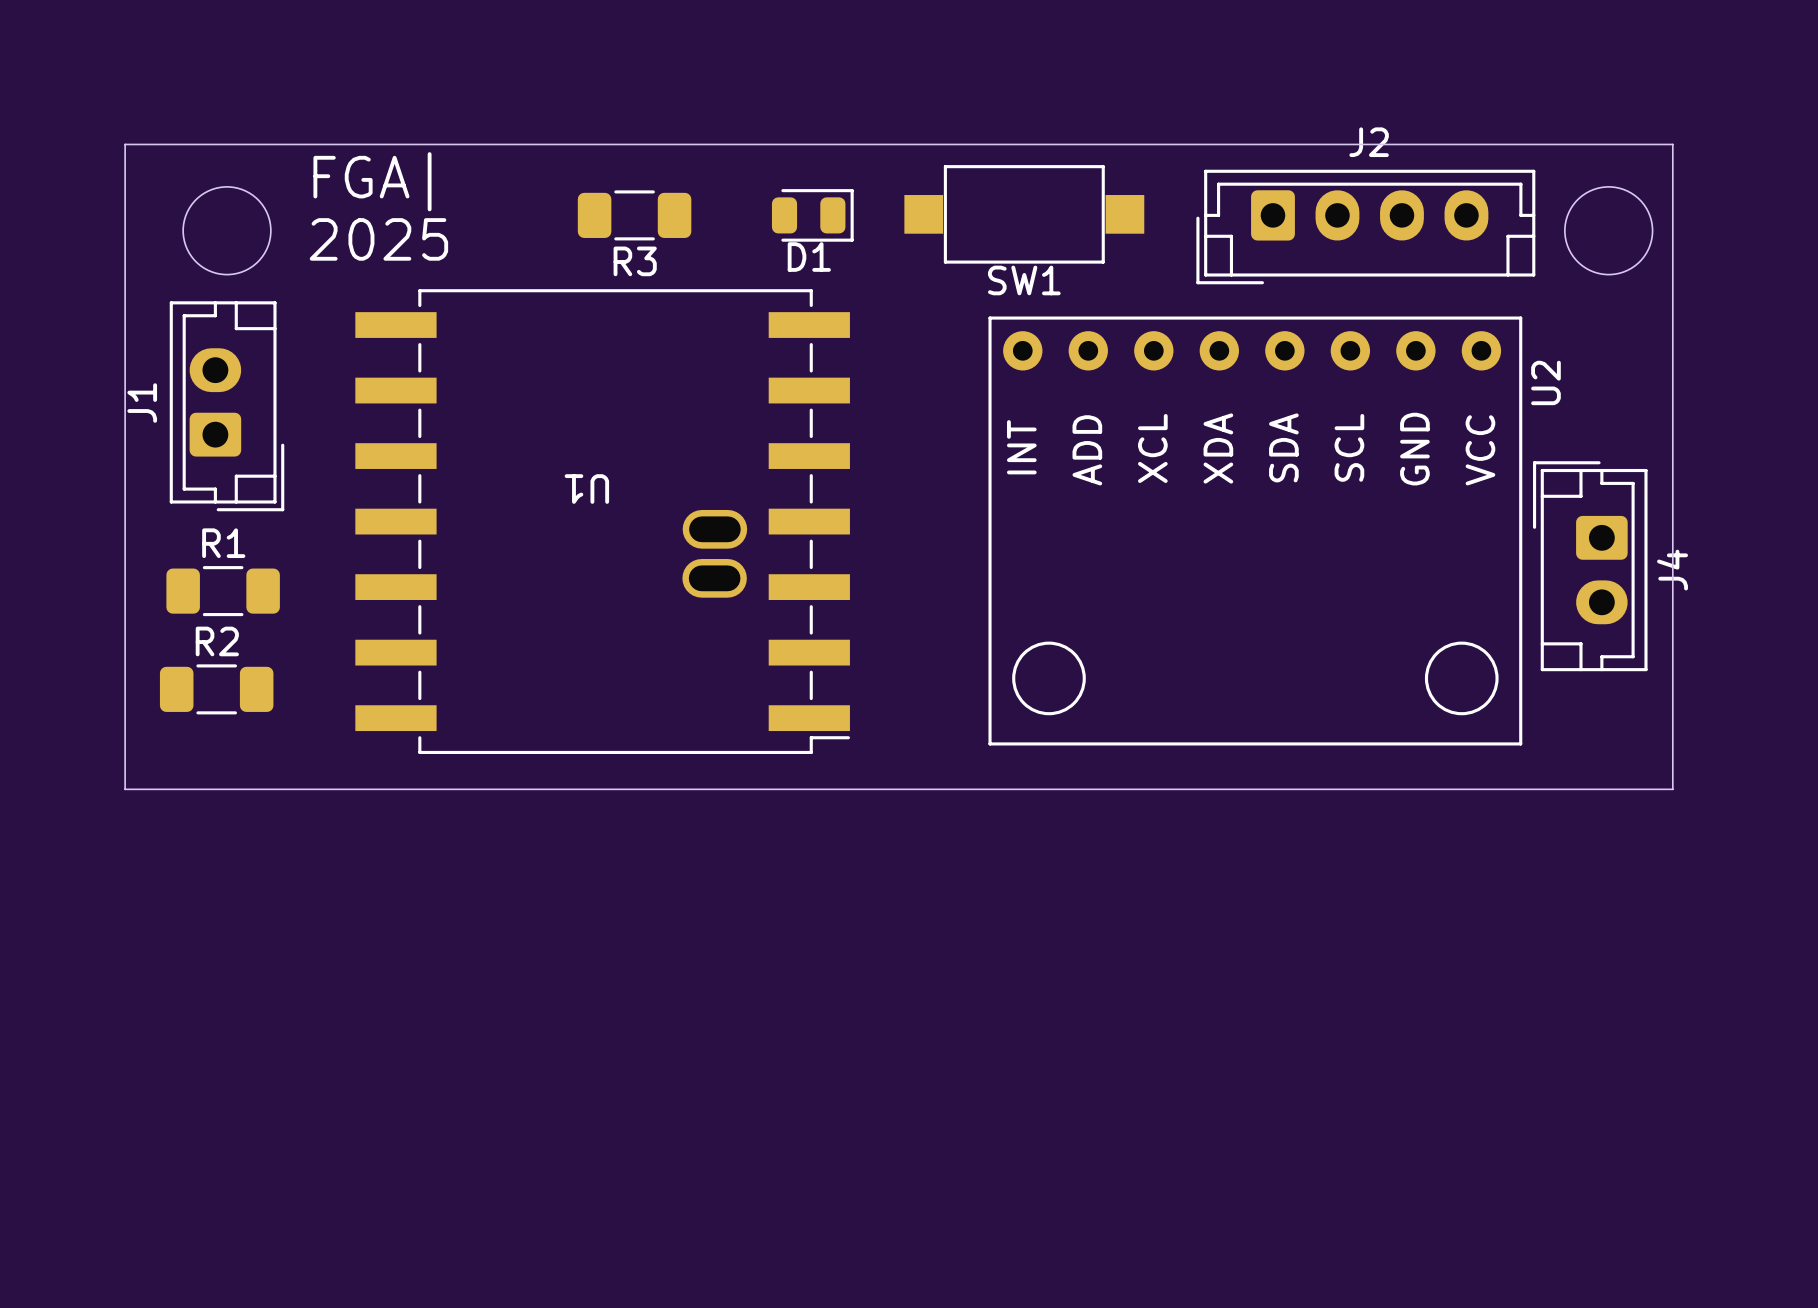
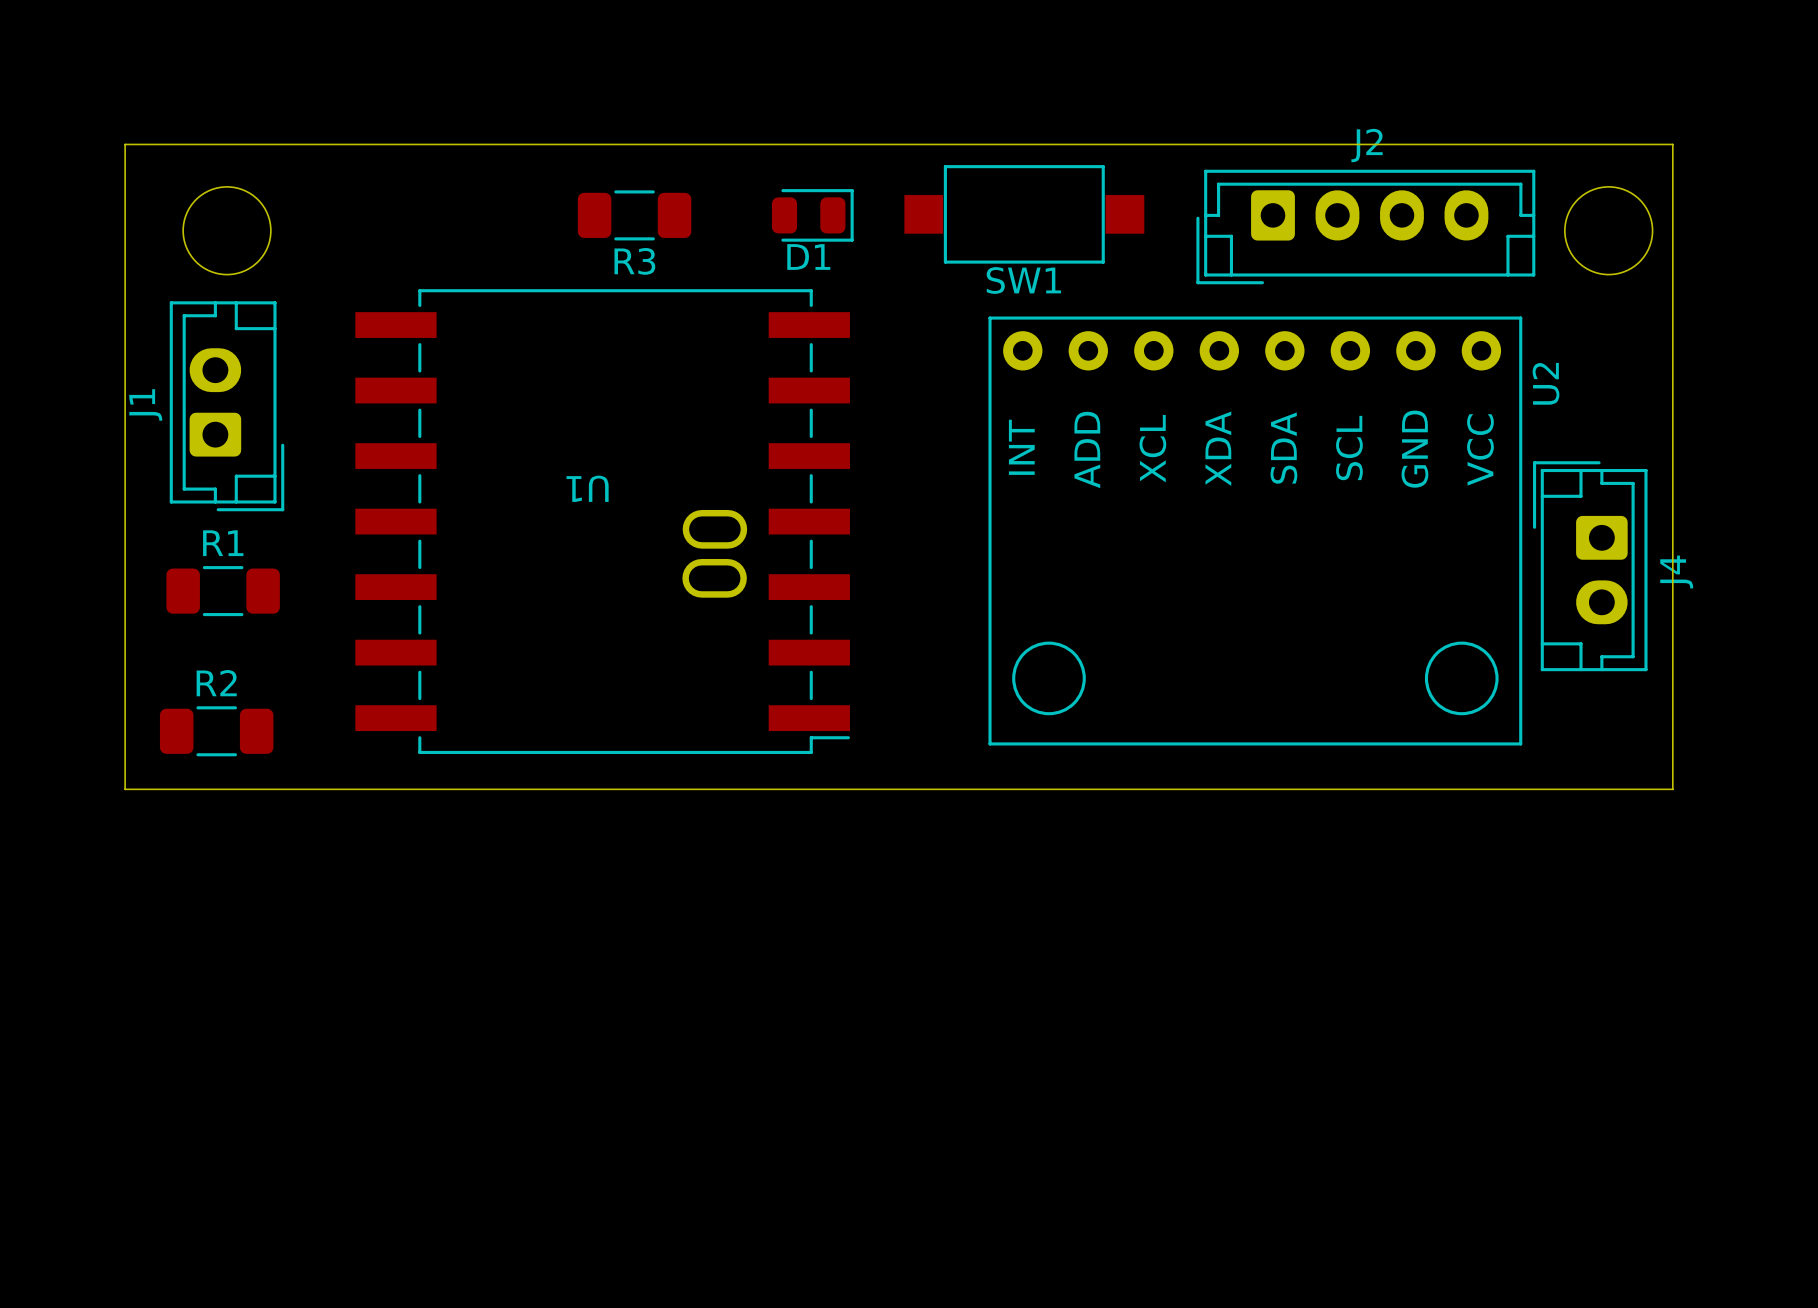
text: FGA| (372, 181) -> none
text: 2025 (378, 239) -> none
R2 position: (216, 689) -> (216, 731)

